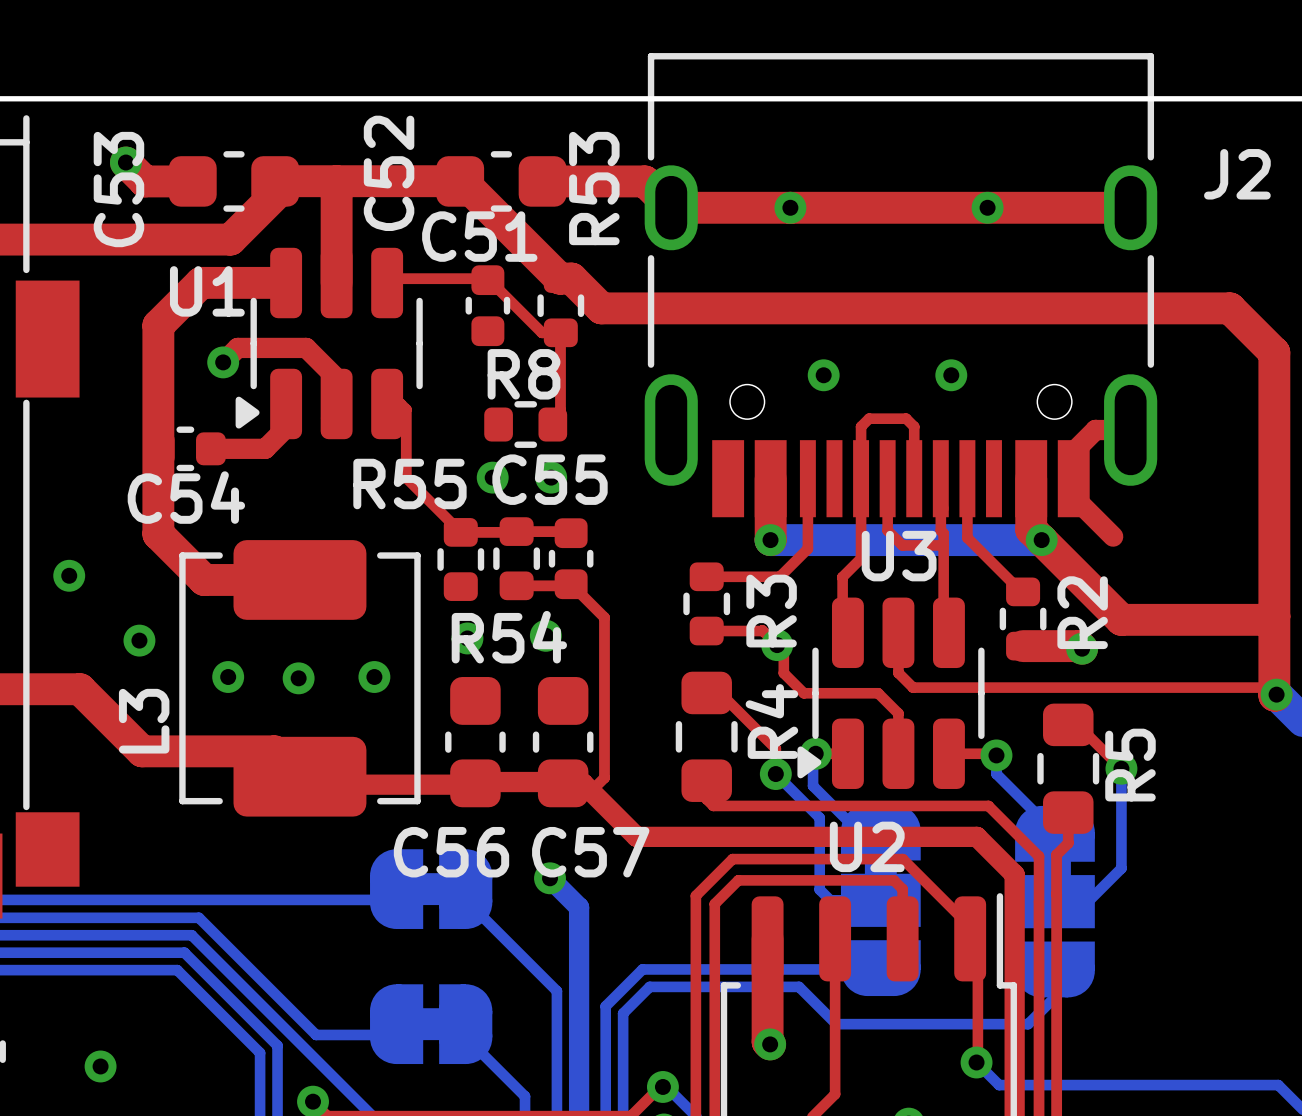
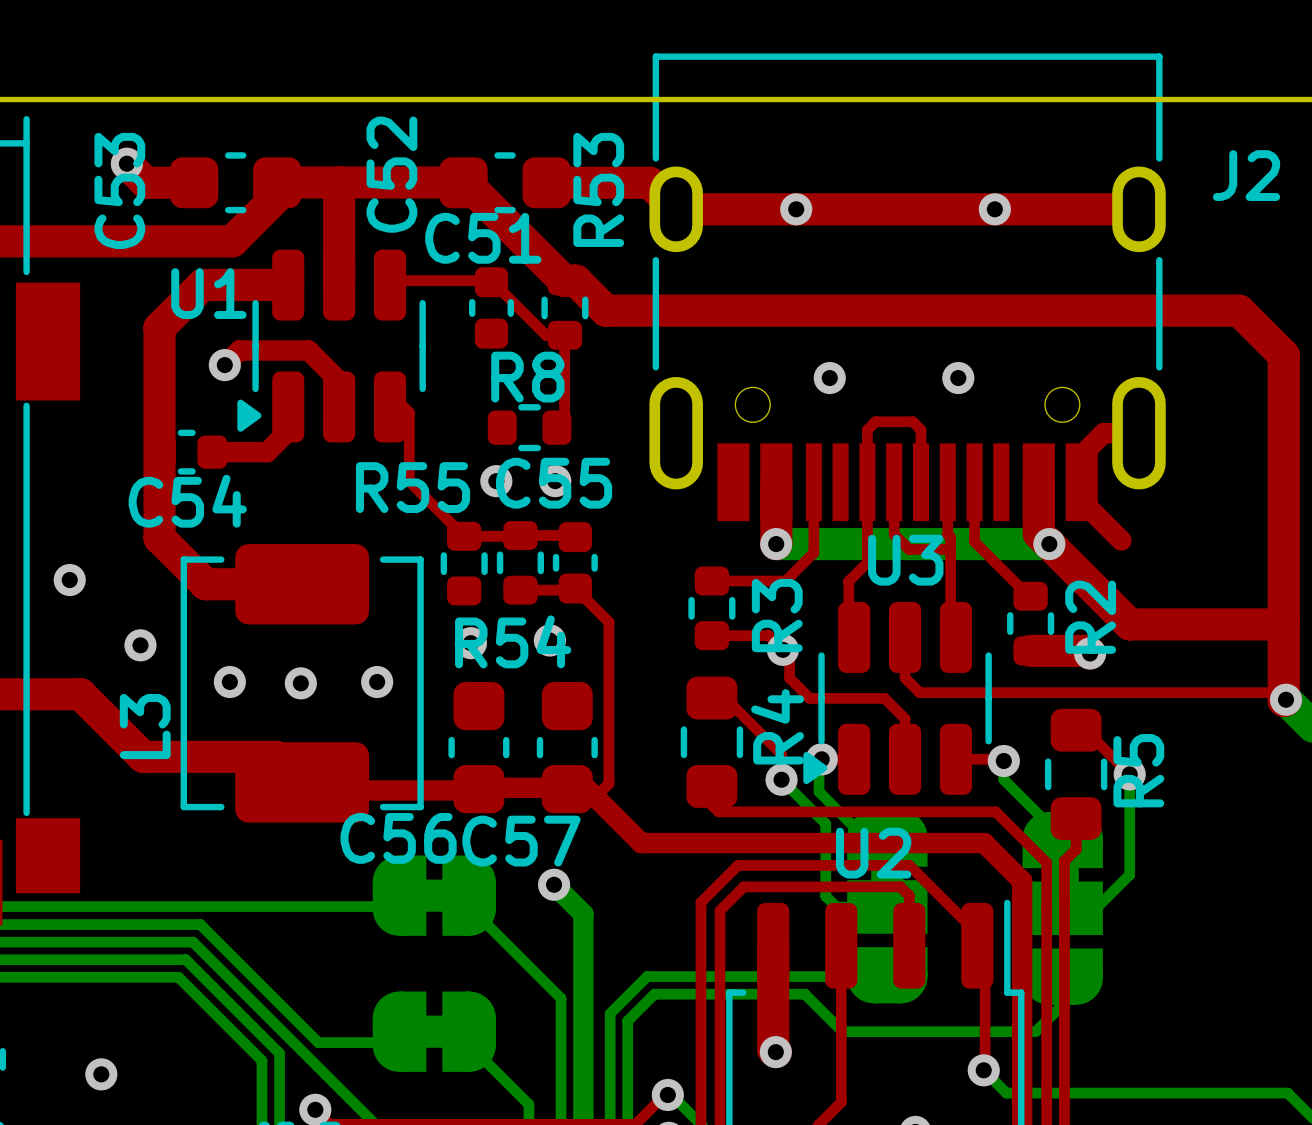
C56 name position: C56 (451, 852) -> C56 (398, 838)
C57 name position: C57 (590, 852) -> C57 (521, 841)

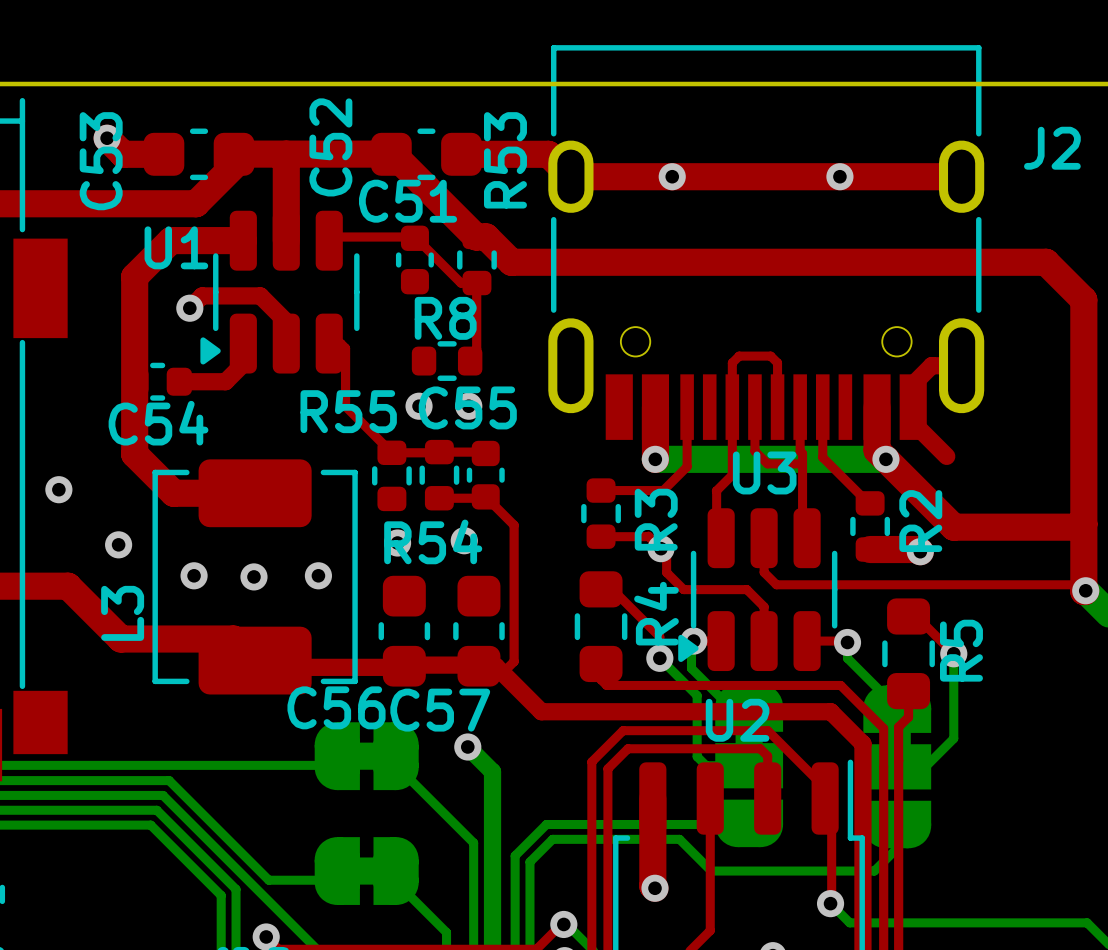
via: (829, 378) -> none
via: (958, 378) -> none
via: (101, 1074) -> none

